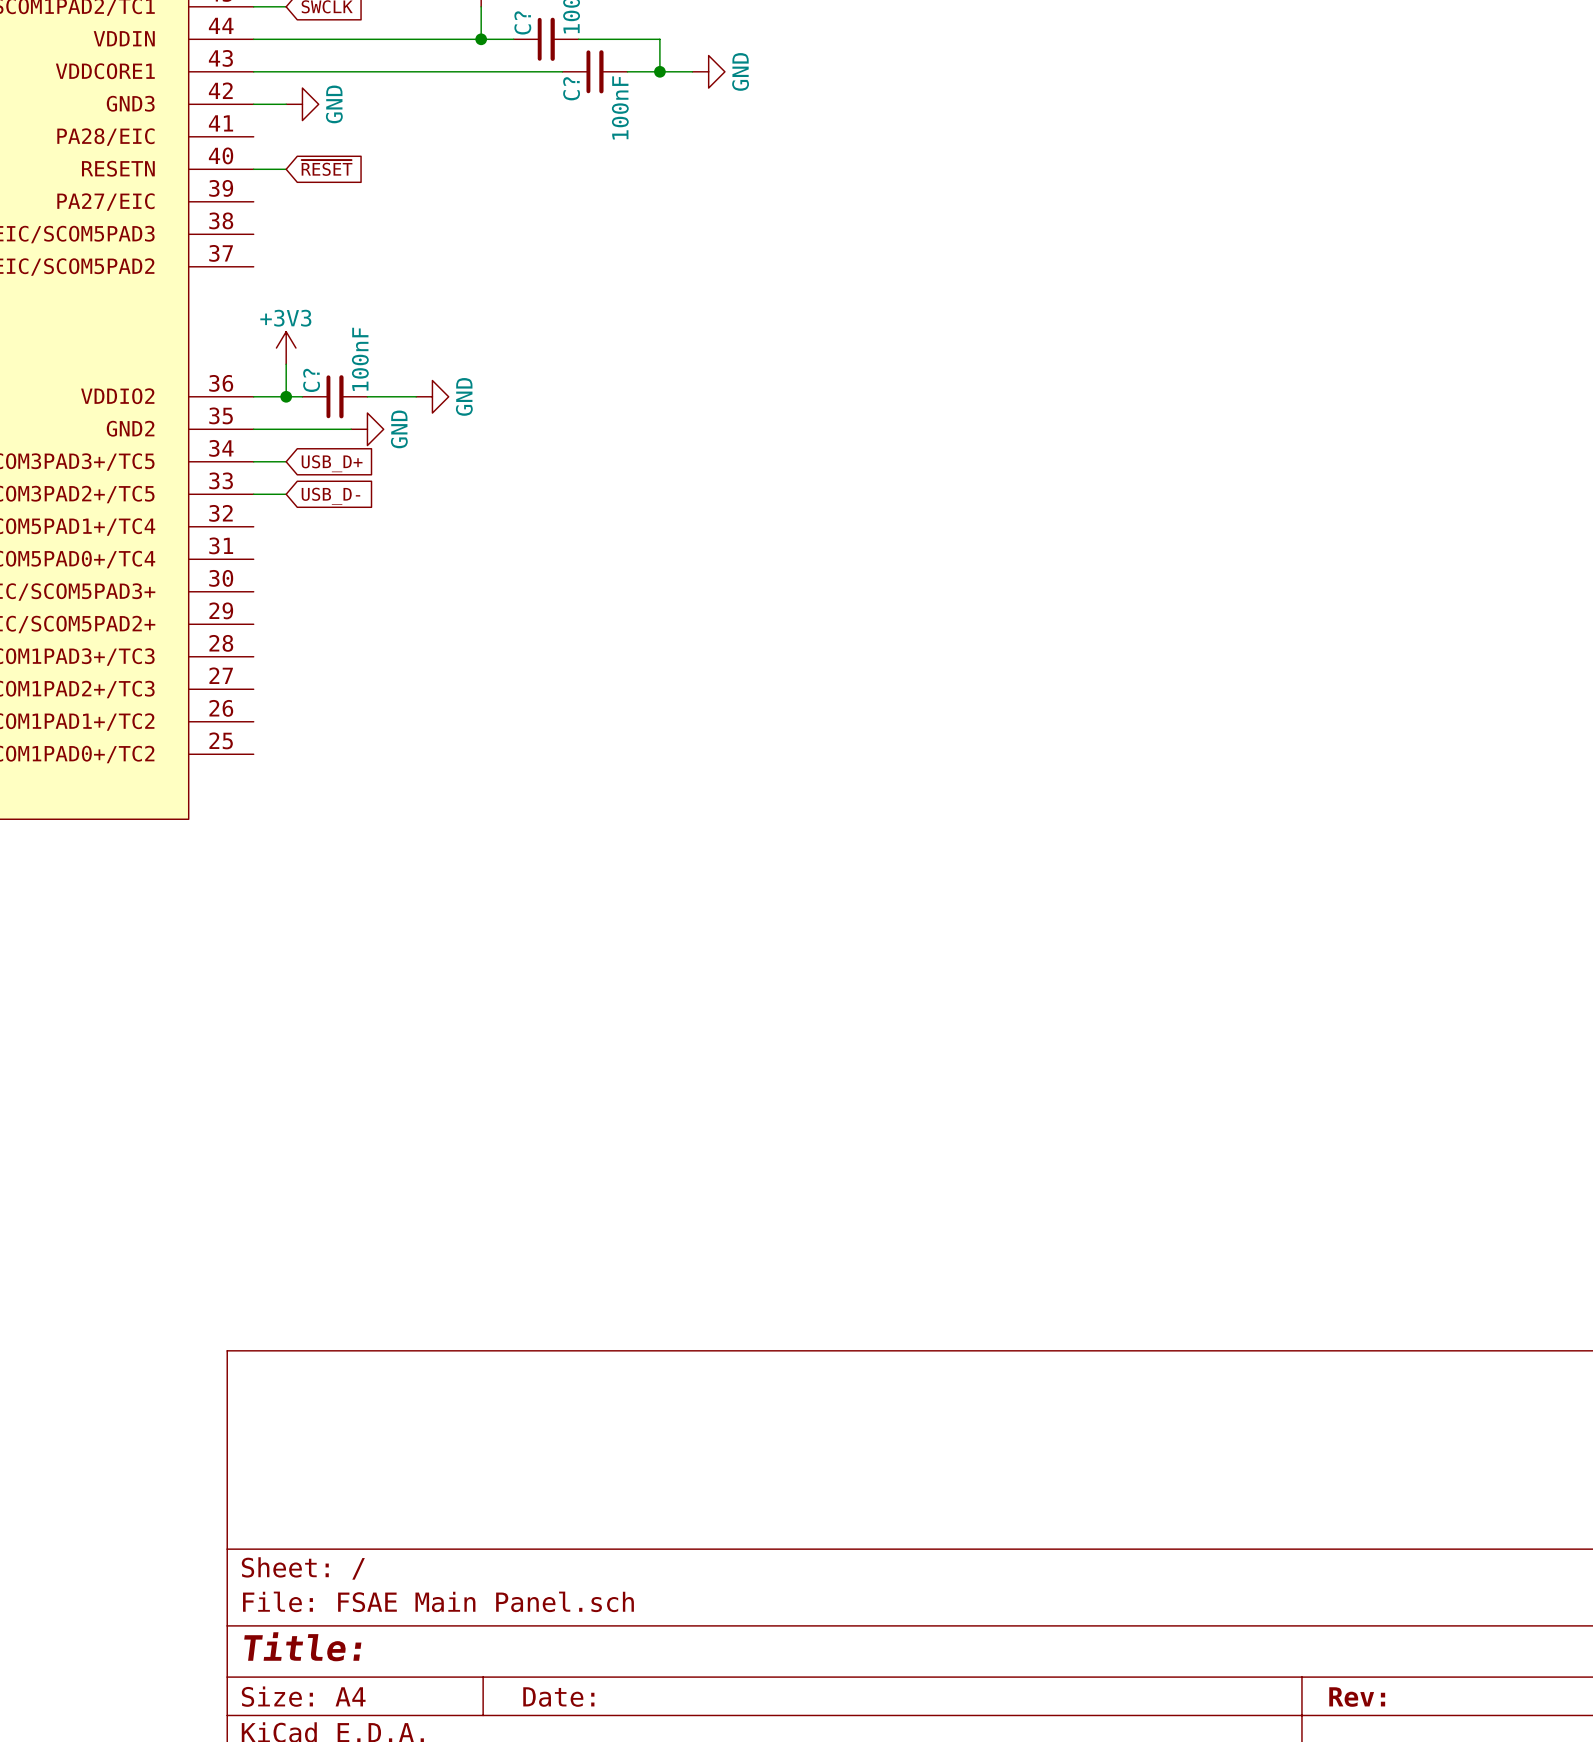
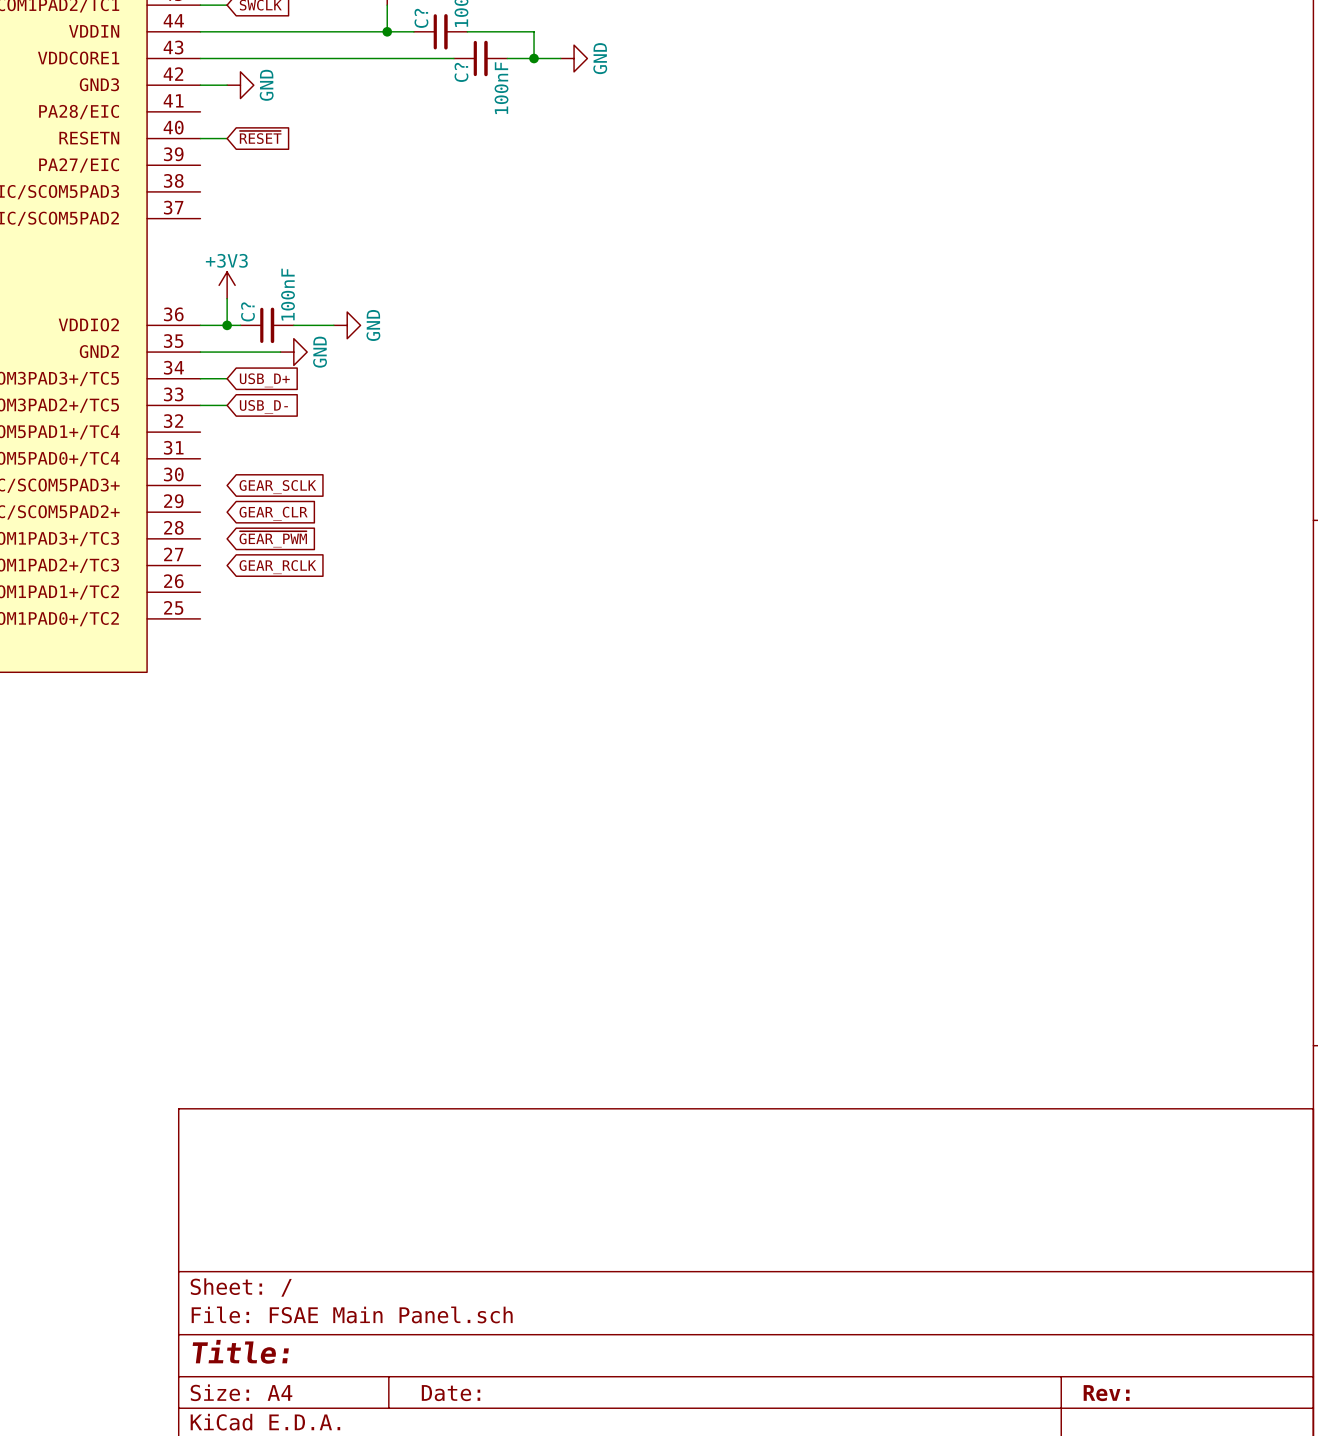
global label: none -> GEAR_SCLK (277, 487)
global label: none -> GEAR_CLR (273, 513)
global label: none -> ~{GEAR_PWM} (273, 539)
global label: none -> GEAR_RCLK (277, 567)

